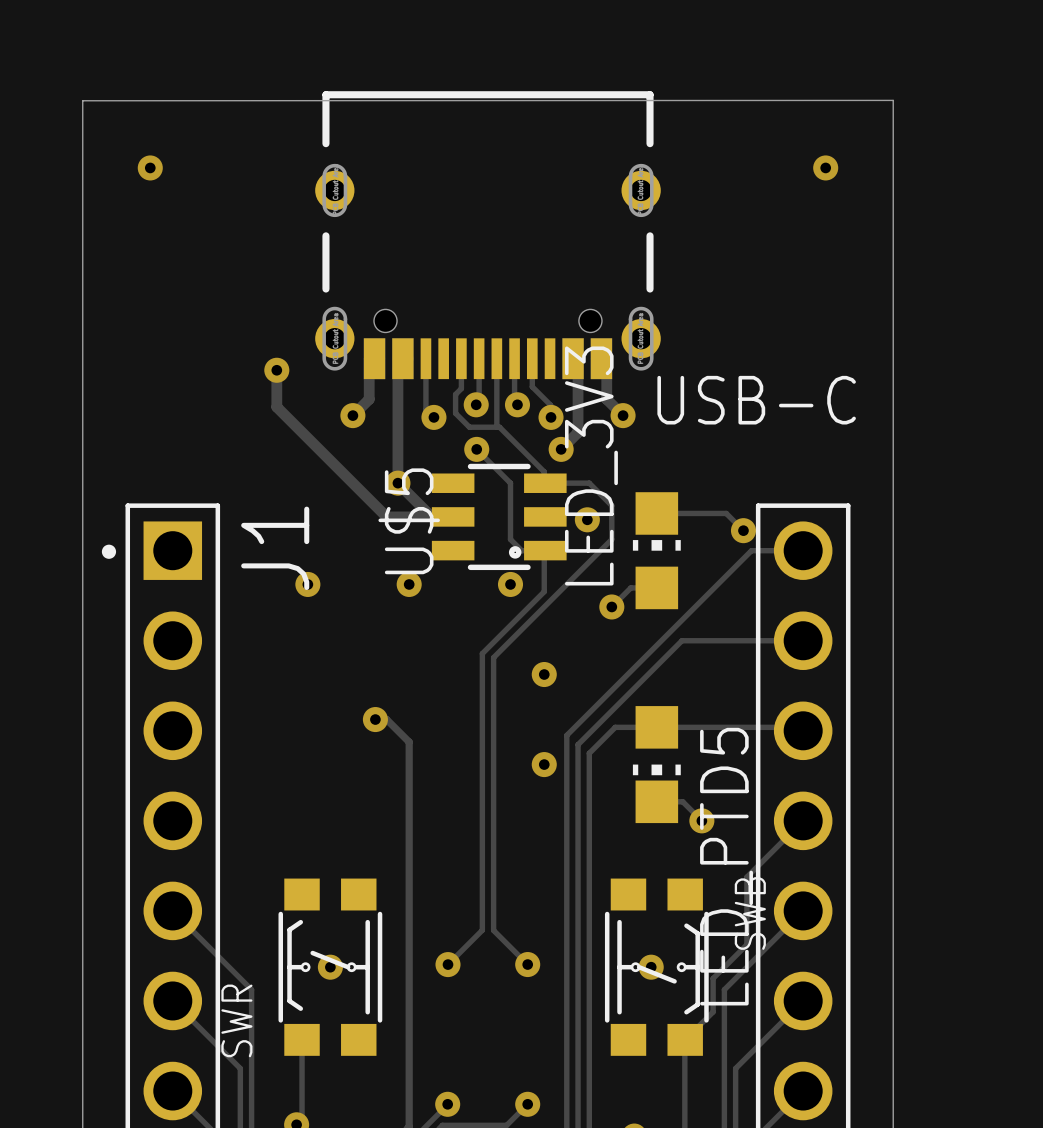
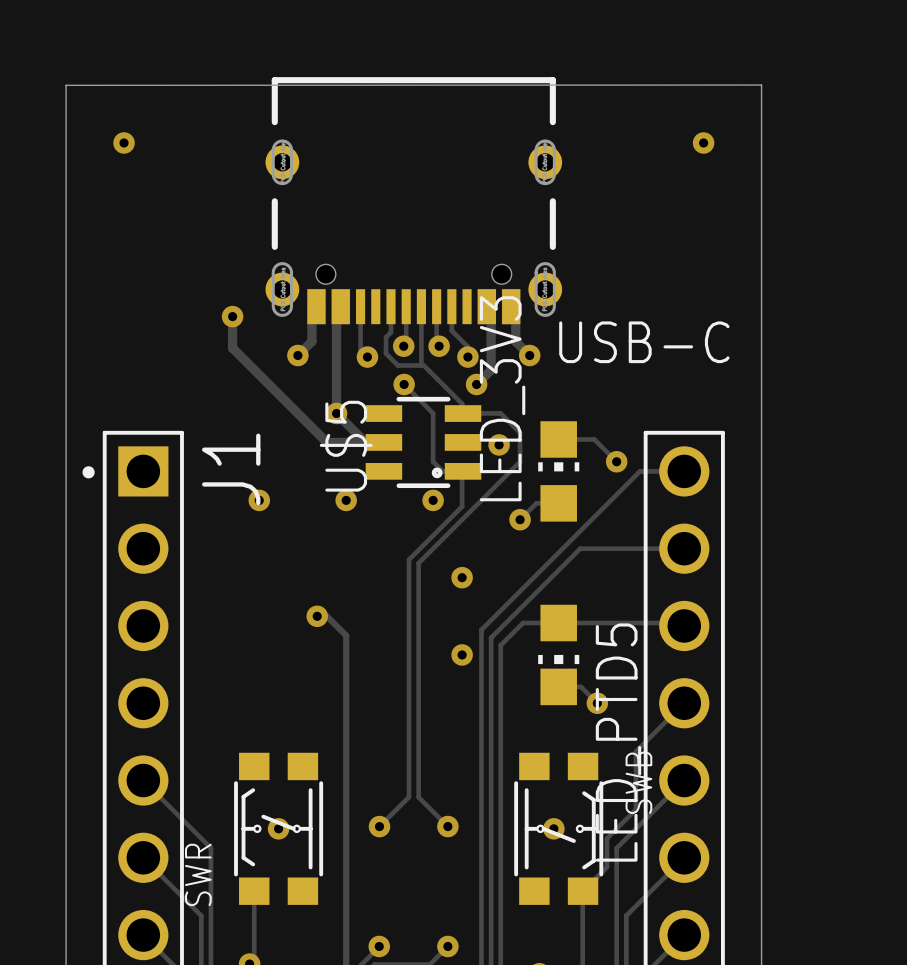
track: (698, 513) (726, 513) (743, 530) -> (594, 439) (616, 461)
via position: (743, 530) -> (616, 461)

